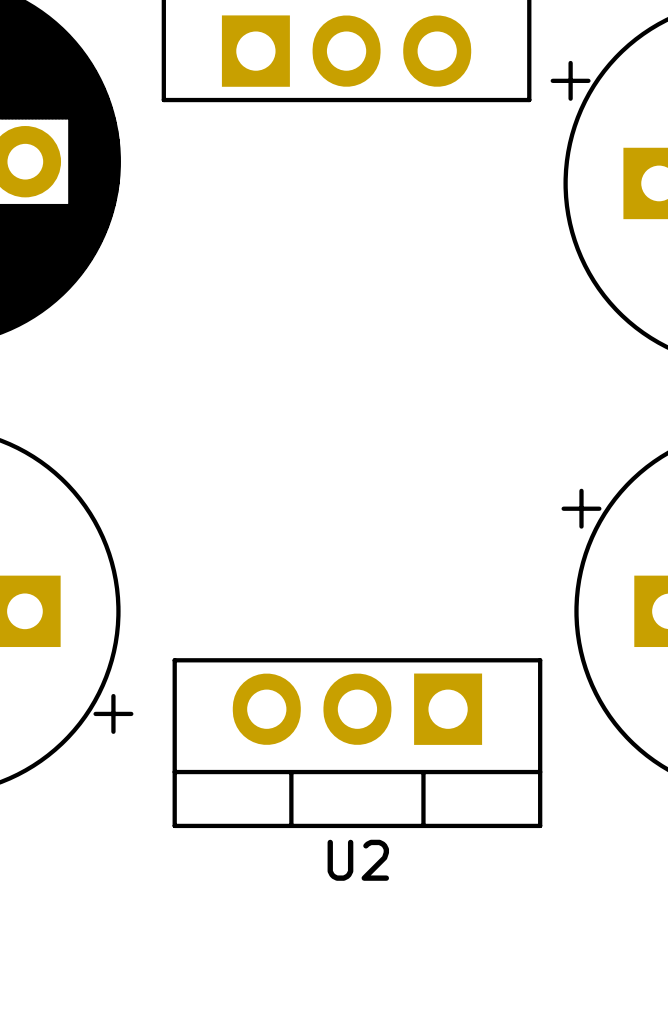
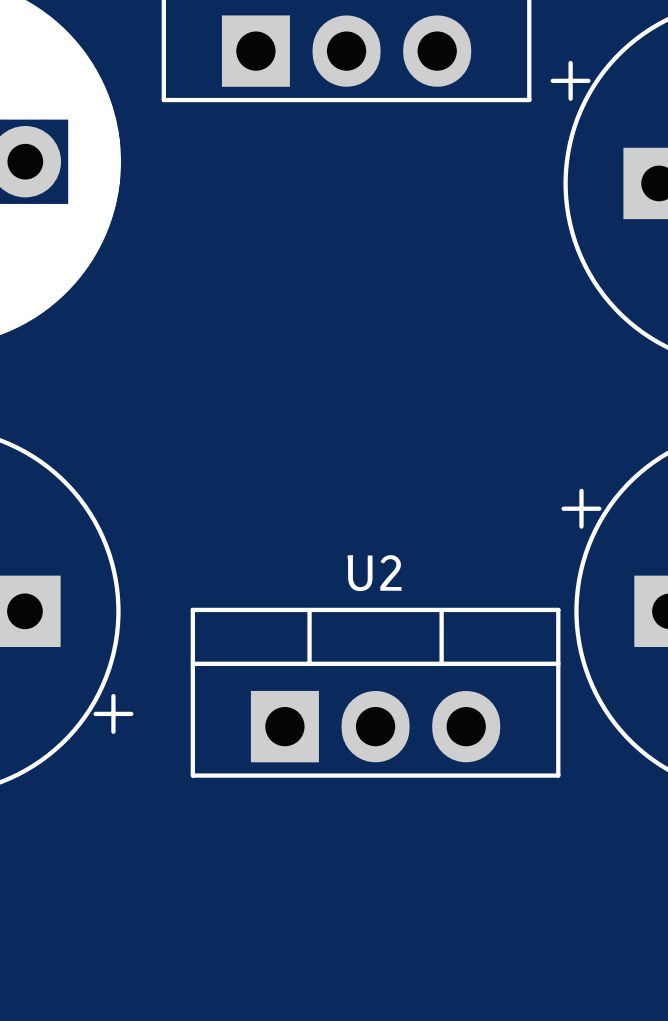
U2 rotation: 0° (357, 743) -> 180° (375, 692)

